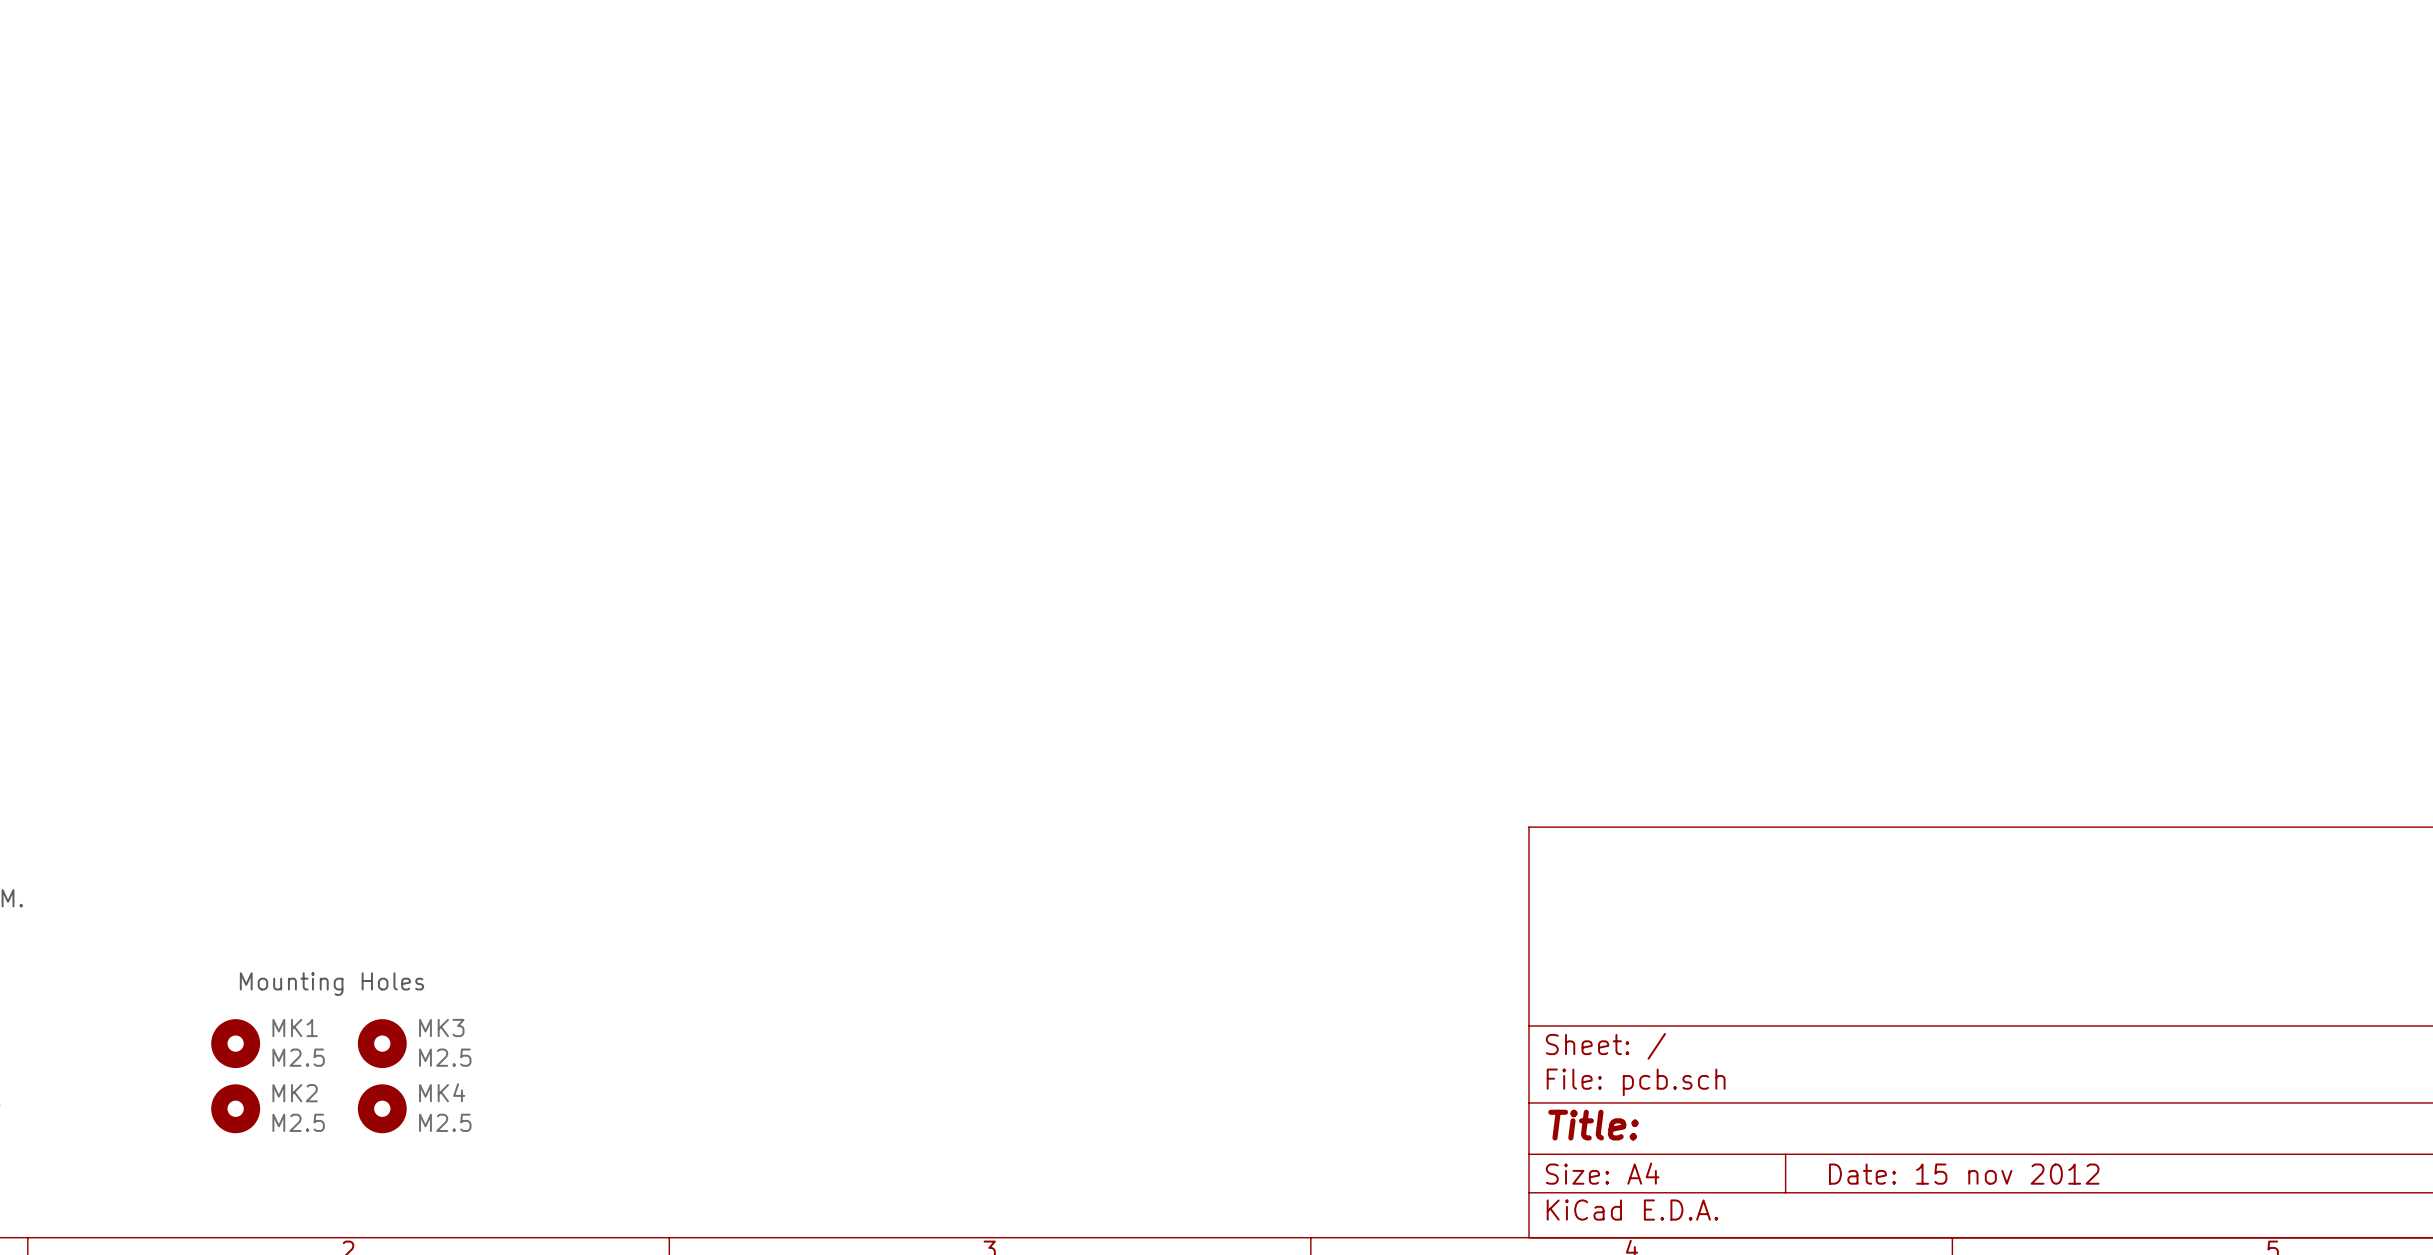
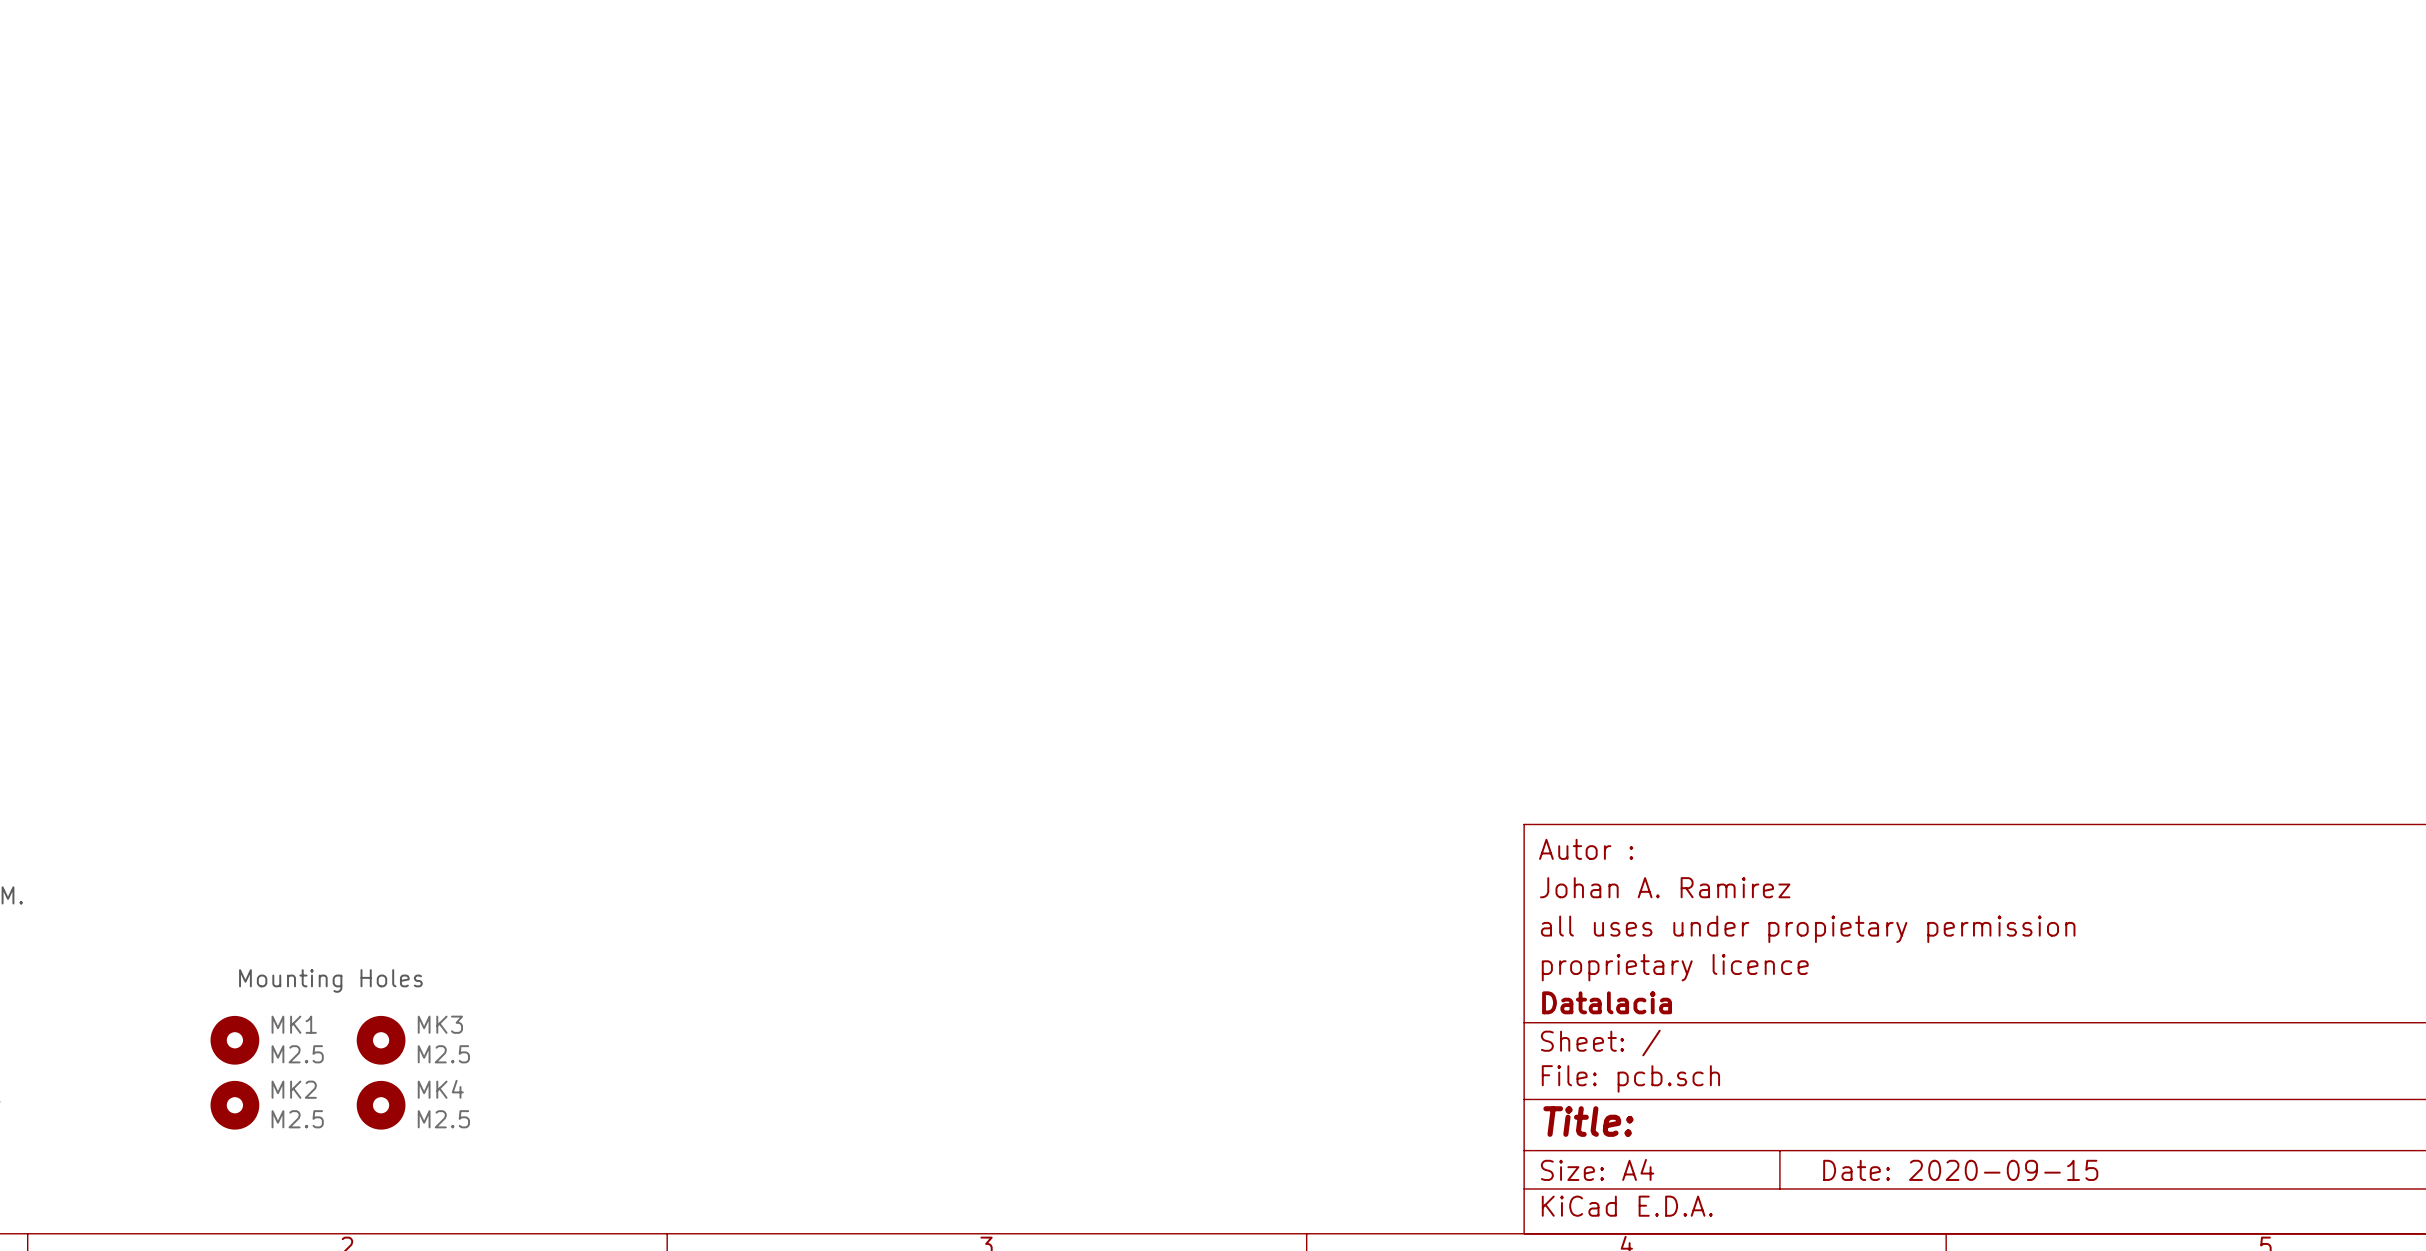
title block: none -> Autor : (1586, 849)
title block: none -> Johan A. Ramirez (1665, 887)
title block: none -> all uses under propietary permission (1808, 929)
title block: none -> proprietary licence (1675, 967)
title block: none -> Datalacia (1607, 1002)
title block: Date: 15 nov 2012 (1964, 1174) -> Date: 2020-09-15 (1960, 1170)

